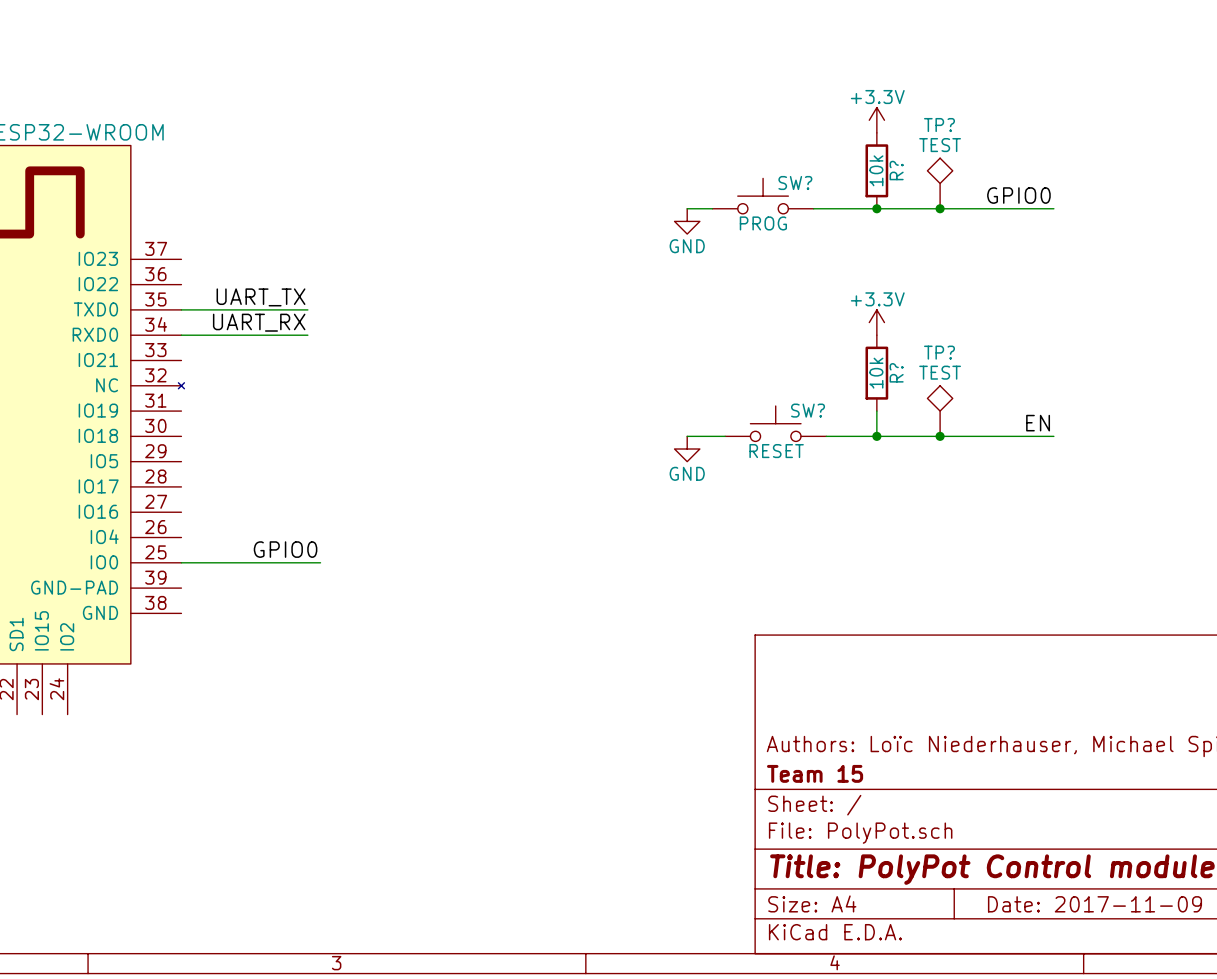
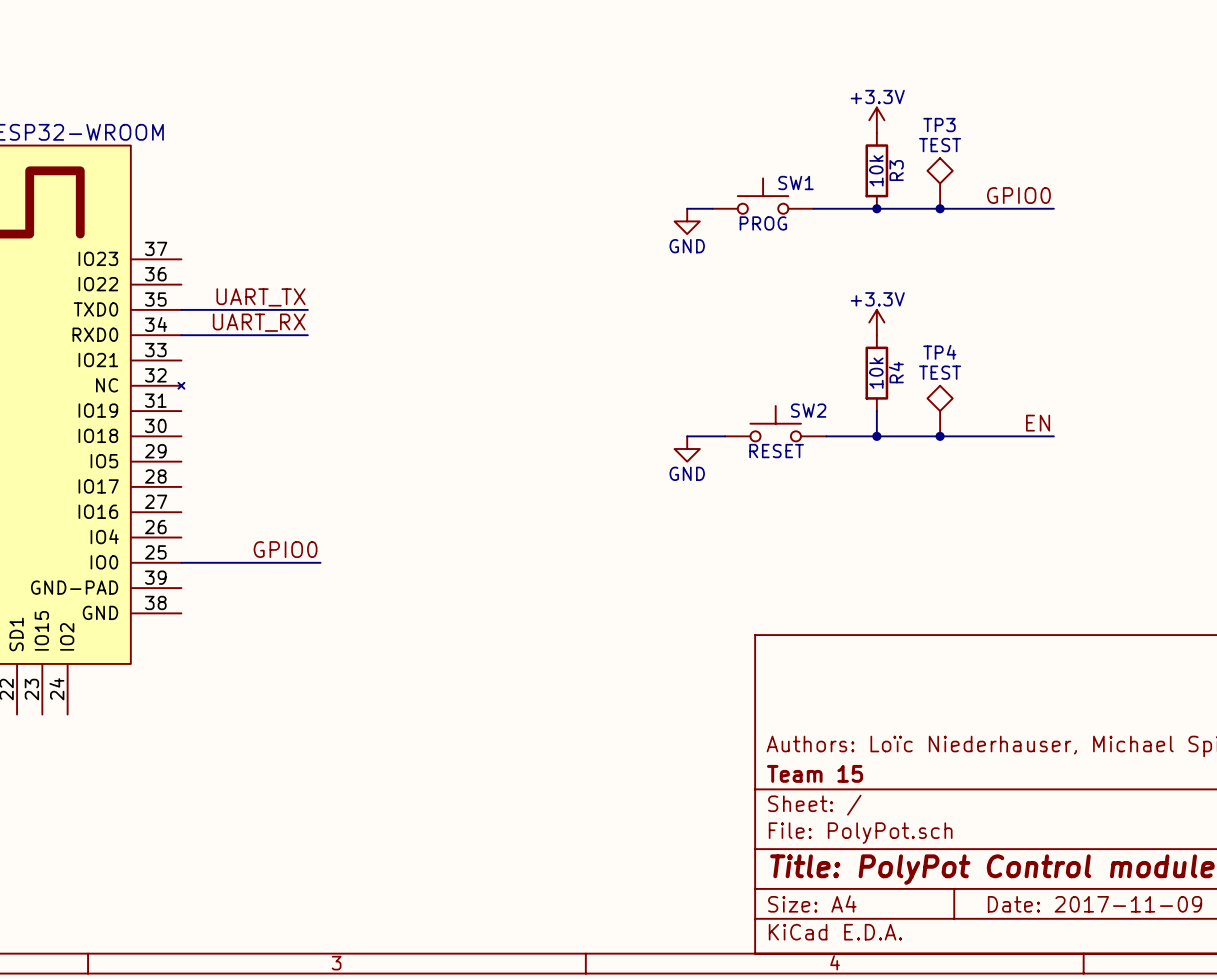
TP? name: TP? (939, 125) -> TP3 (939, 125)
R? name: R? (896, 170) -> R3 (896, 170)
SW? name: SW? (795, 183) -> SW1 (795, 183)
TP? name: TP? (939, 352) -> TP4 (939, 352)
R? name: R? (896, 372) -> R4 (896, 372)
SW? name: SW? (808, 410) -> SW2 (808, 410)

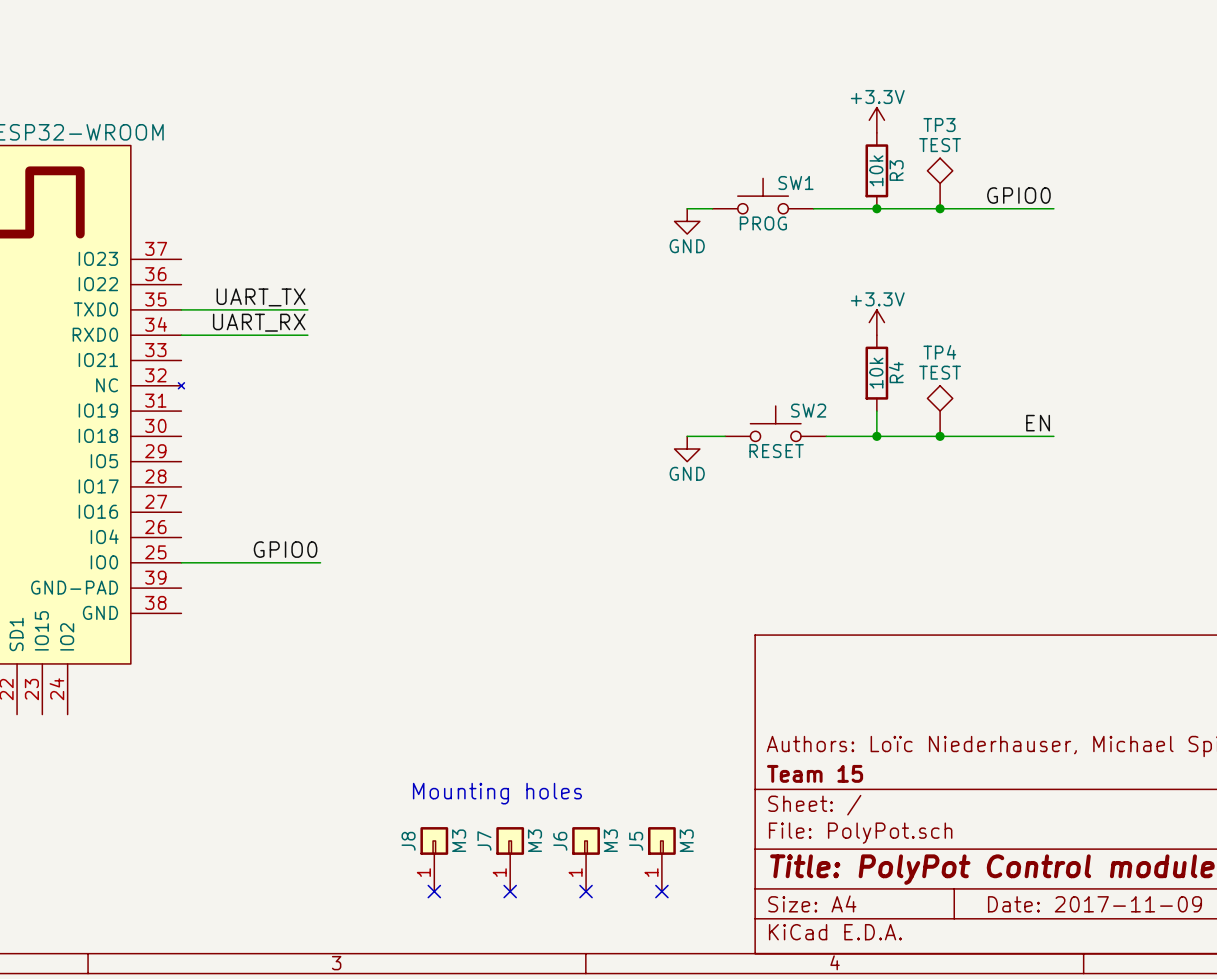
text: none -> Mounting holes (497, 793)
J8: none -> M3 (434, 859)
J7: none -> M3 (510, 859)
J6: none -> M3 (586, 859)
J5: none -> M3 (661, 859)
no-connect mark: none -> (434, 891)
no-connect mark: none -> (510, 891)
no-connect mark: none -> (586, 891)
no-connect mark: none -> (661, 891)

